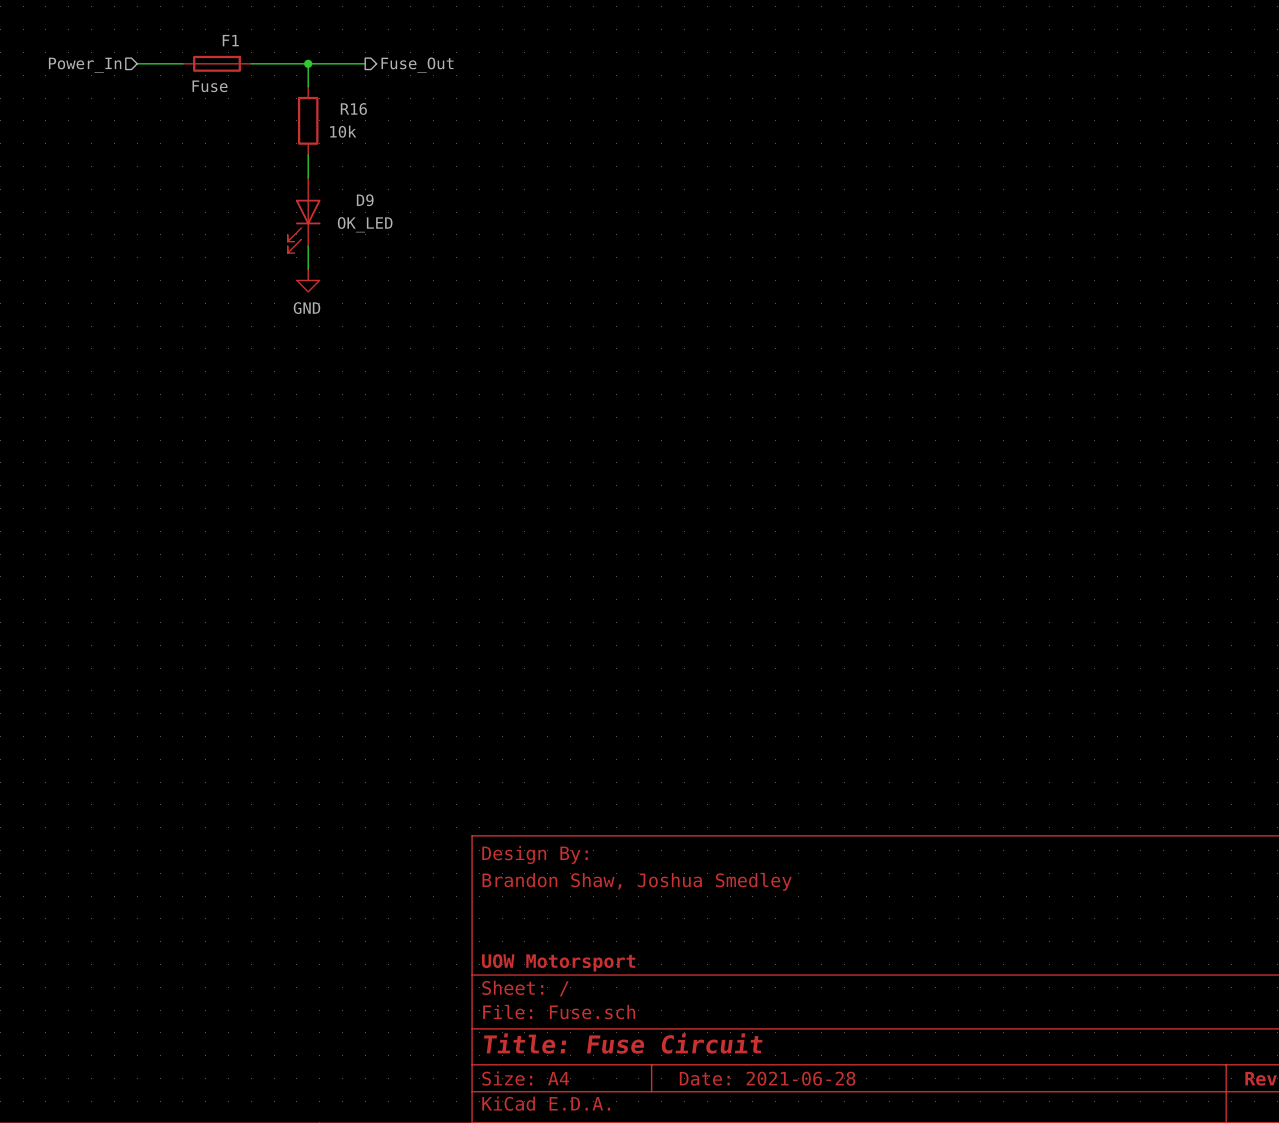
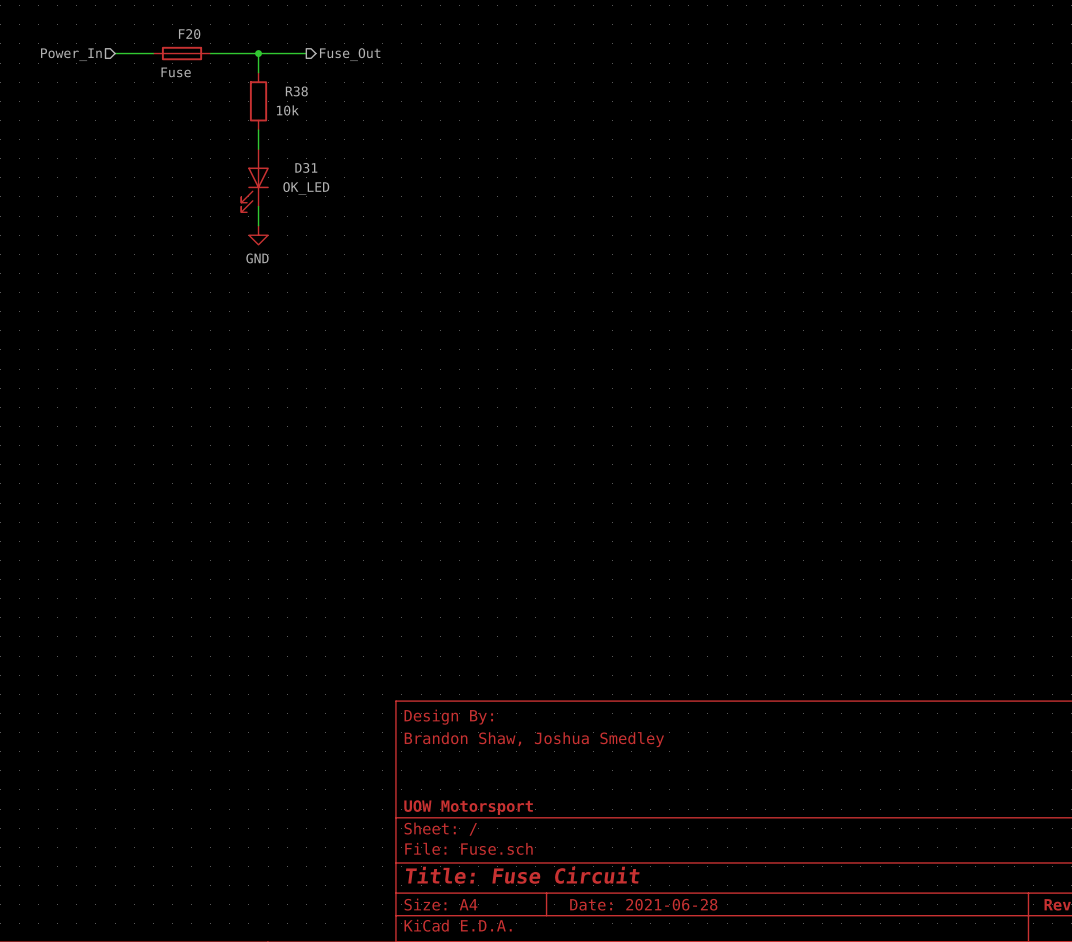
F1 name: F1 (230, 40) -> F20 (189, 34)
R16 name: R16 (353, 109) -> R38 (296, 91)
D9 name: D9 (365, 200) -> D31 (306, 167)

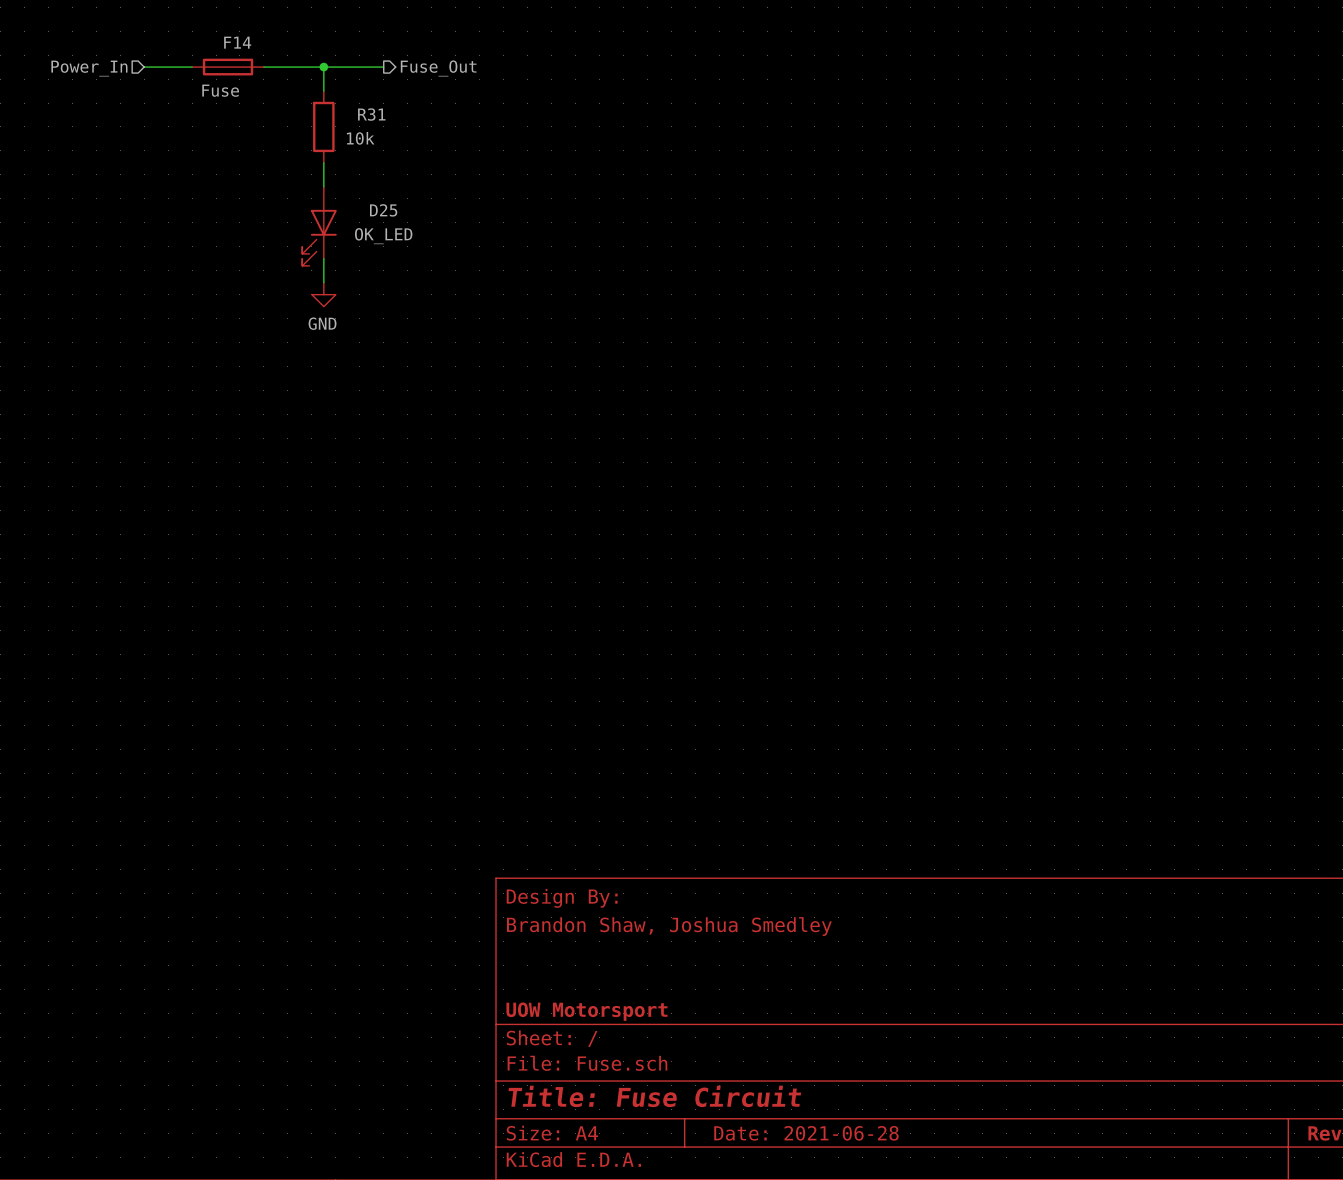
F20 name: F20 (189, 34) -> F14 (237, 42)
R38 name: R38 (296, 91) -> R31 (371, 114)
D31 name: D31 (306, 167) -> D25 (383, 210)

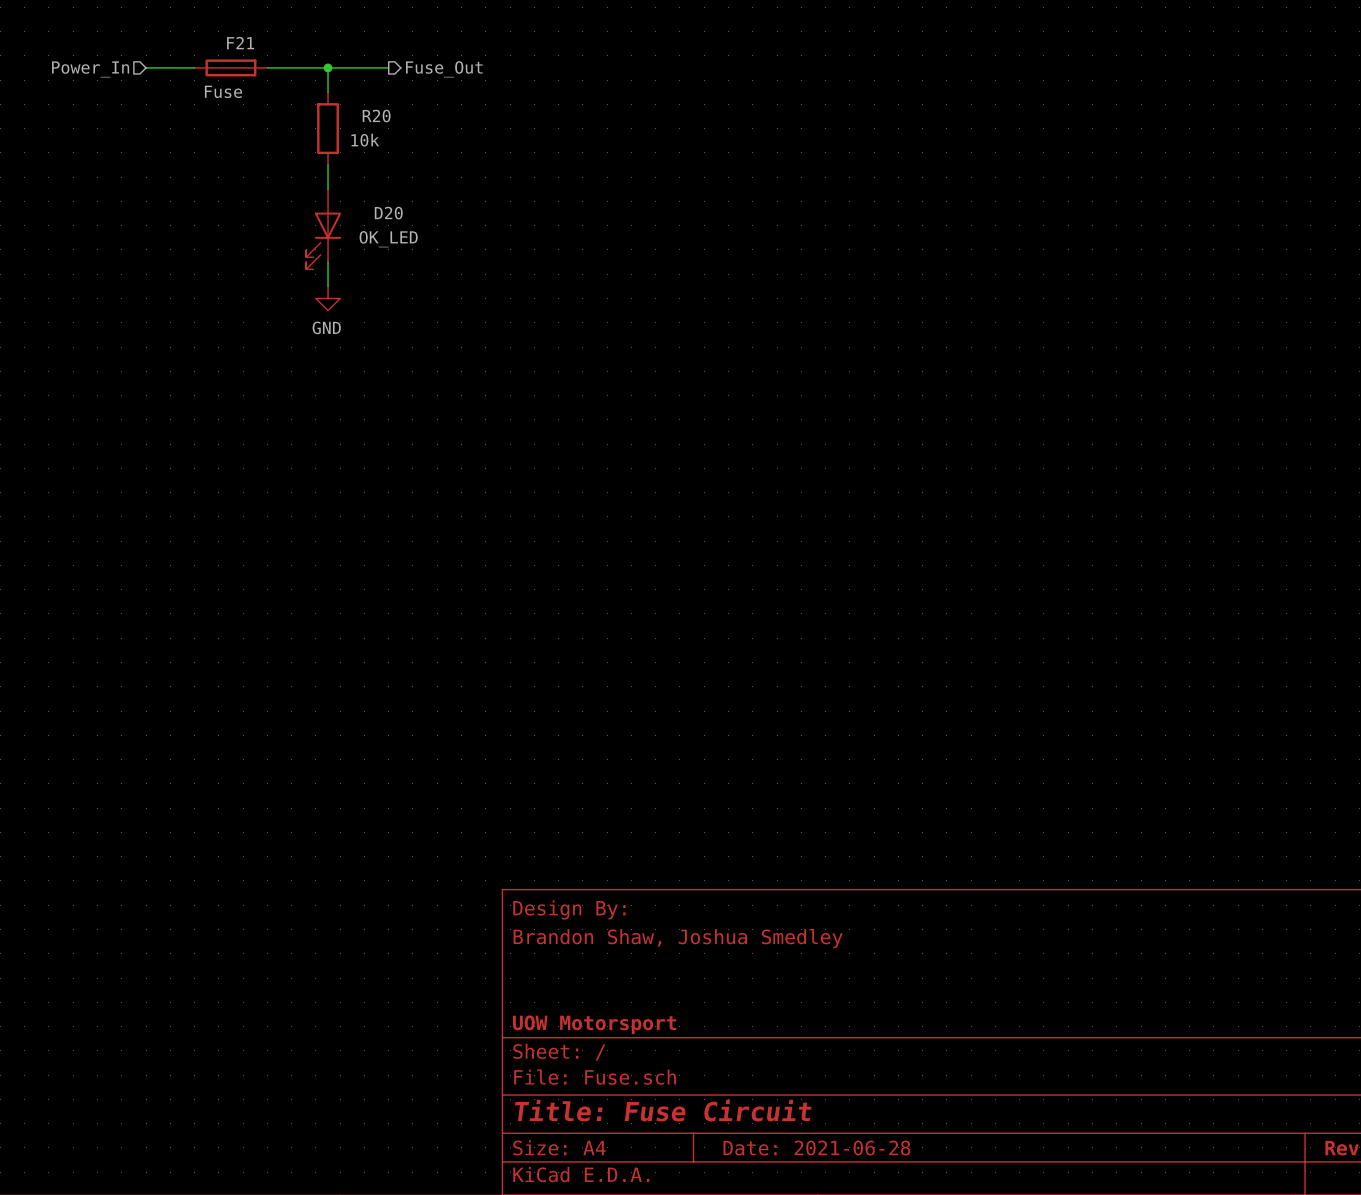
F14 name: F14 (237, 42) -> F21 (240, 43)
R31 name: R31 (371, 114) -> R20 (376, 116)
D25 name: D25 (383, 210) -> D20 (388, 213)

